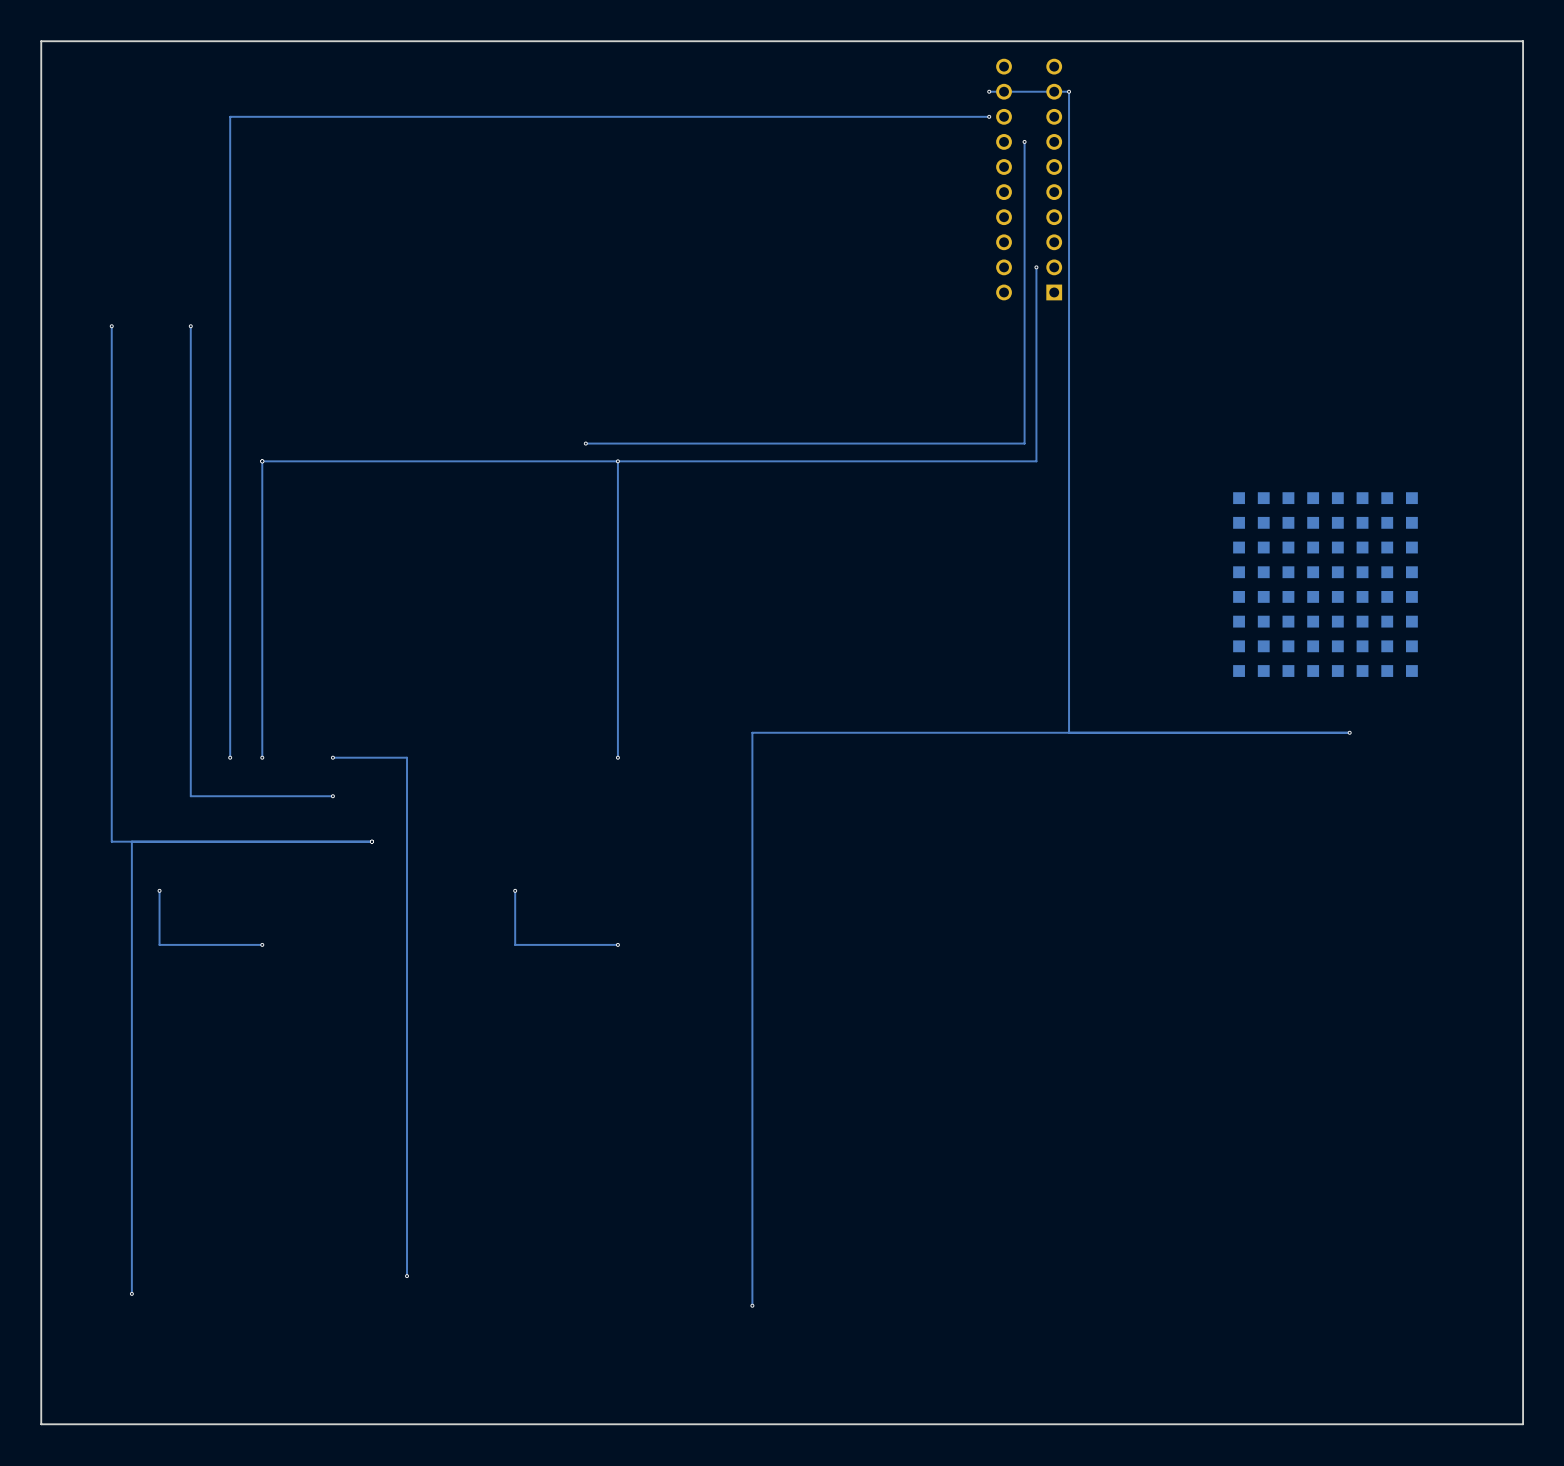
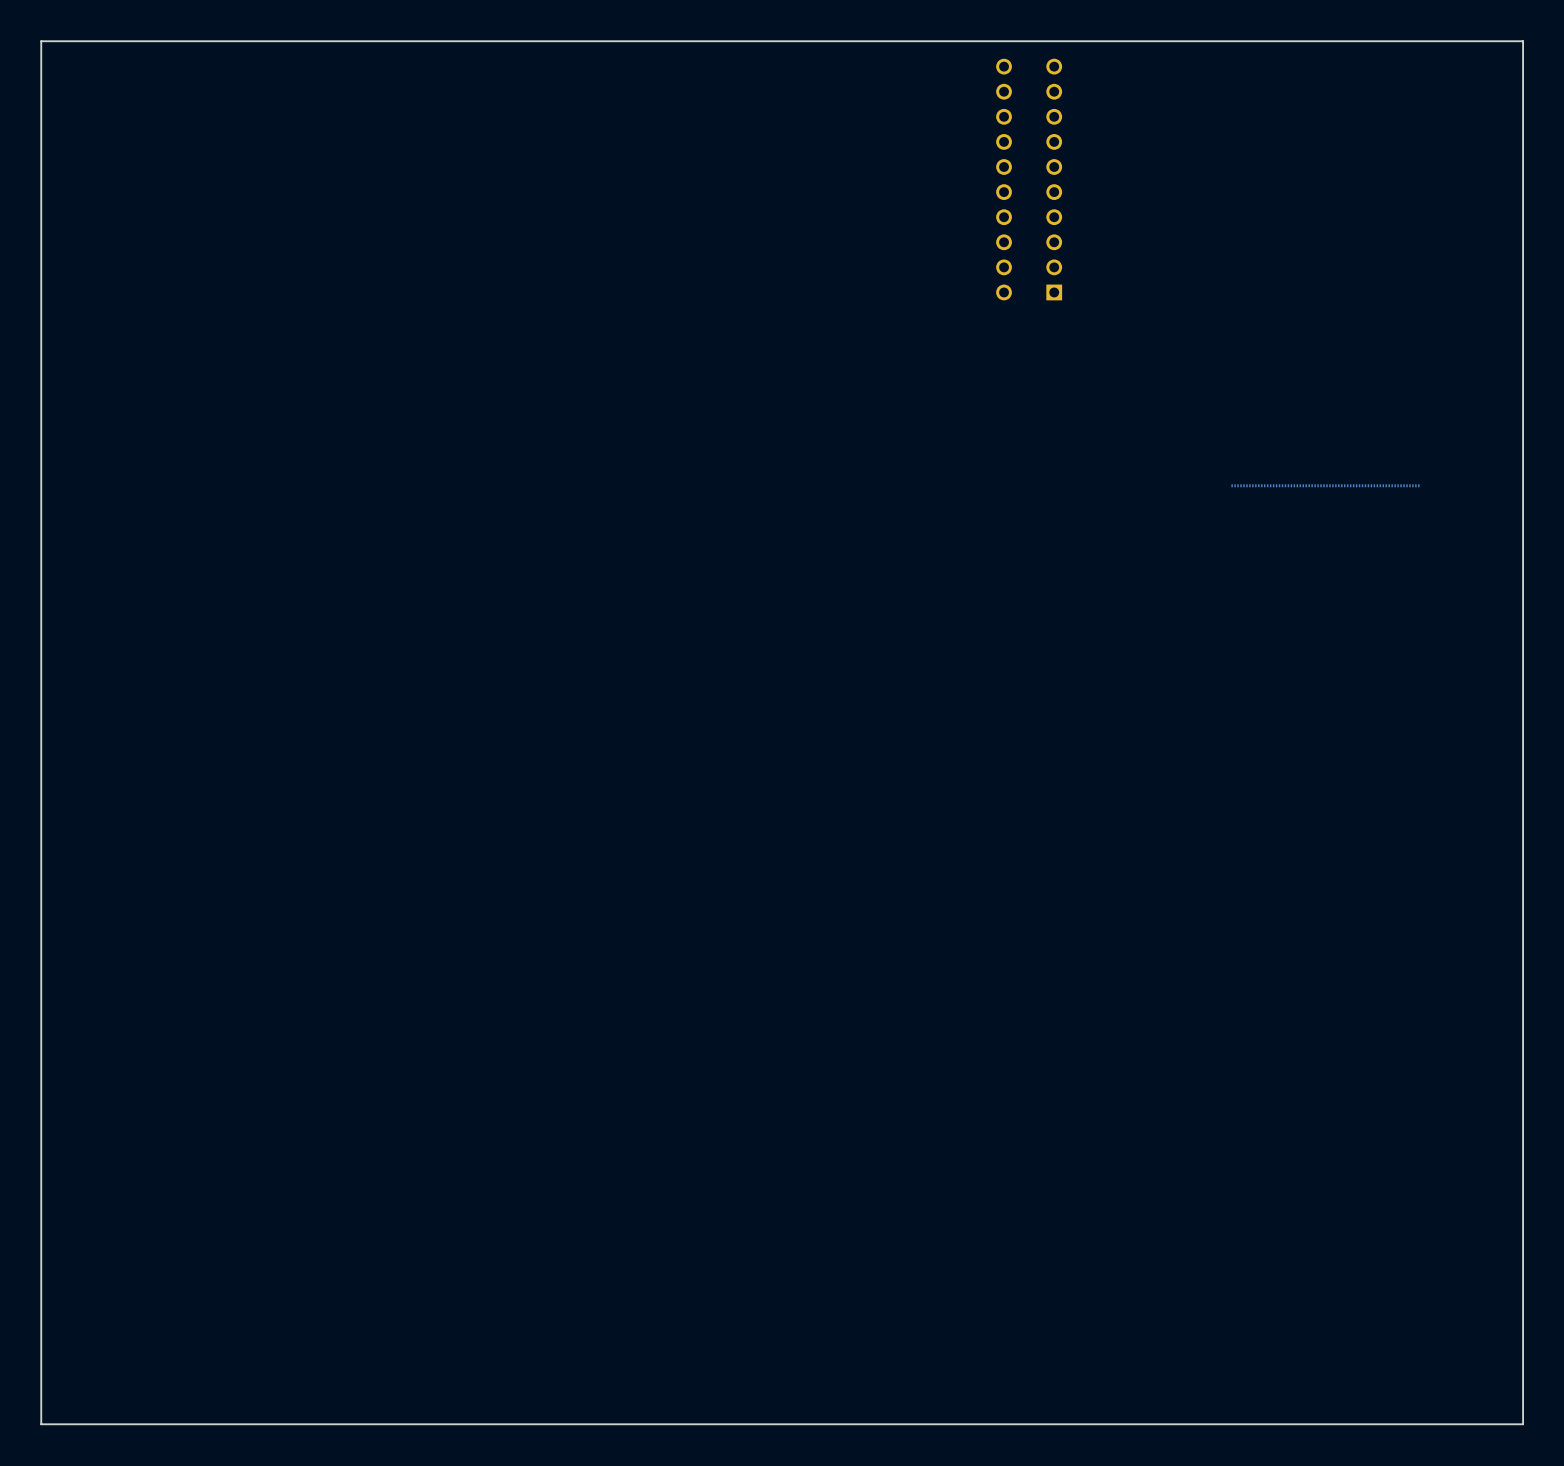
track: (989, 91) (1069, 91) (1069, 732) -> none
via: (989, 91) -> none
via: (1069, 91) -> none
track: (989, 116) (230, 116) (230, 757) -> none
via: (989, 116) -> none
track: (1024, 141) (1024, 443) (585, 443) -> none
via: (1024, 141) -> none
track: (1036, 267) (1036, 461) (262, 461) (262, 757) -> none
via: (1036, 267) -> none
track: (111, 326) (111, 841) (371, 841) -> none
via: (111, 326) -> none
track: (190, 326) (190, 796) (332, 796) -> none
via: (190, 326) -> none
via: (585, 443) -> none
via: (262, 461) -> none
track: (617, 461) (617, 757) -> none
via: (617, 461) -> none
part: none -> (1325, 485)
part: (1325, 584) -> none
track: (1349, 732) (752, 732) (752, 1305) -> none
via: (1349, 732) -> none
via: (230, 757) -> none
via: (262, 757) -> none
track: (332, 757) (407, 757) (407, 1276) -> none
via: (332, 757) -> none
via: (617, 757) -> none
via: (332, 796) -> none
track: (131, 841) (131, 1293) -> none
via: (371, 841) -> none
track: (159, 890) (159, 944) (262, 944) -> none
via: (159, 890) -> none
track: (515, 890) (515, 944) (617, 944) -> none
via: (515, 890) -> none
via: (262, 944) -> none
via: (617, 944) -> none
via: (407, 1276) -> none
via: (131, 1293) -> none
via: (752, 1305) -> none

